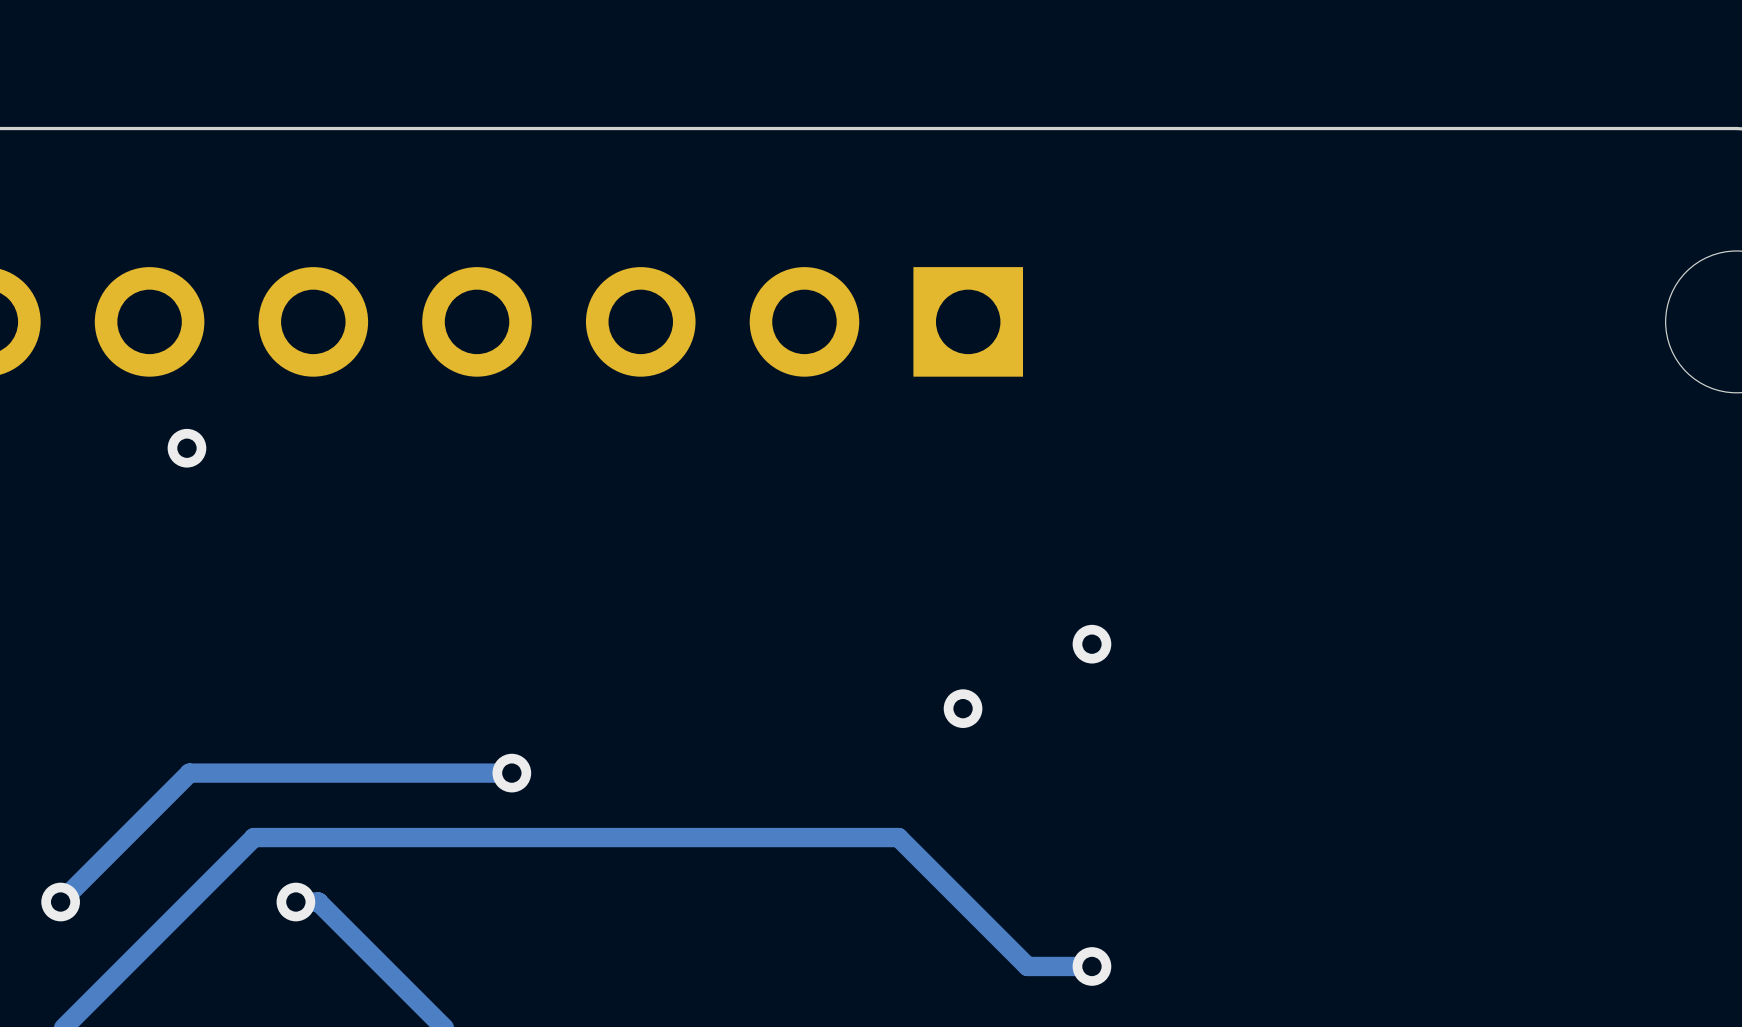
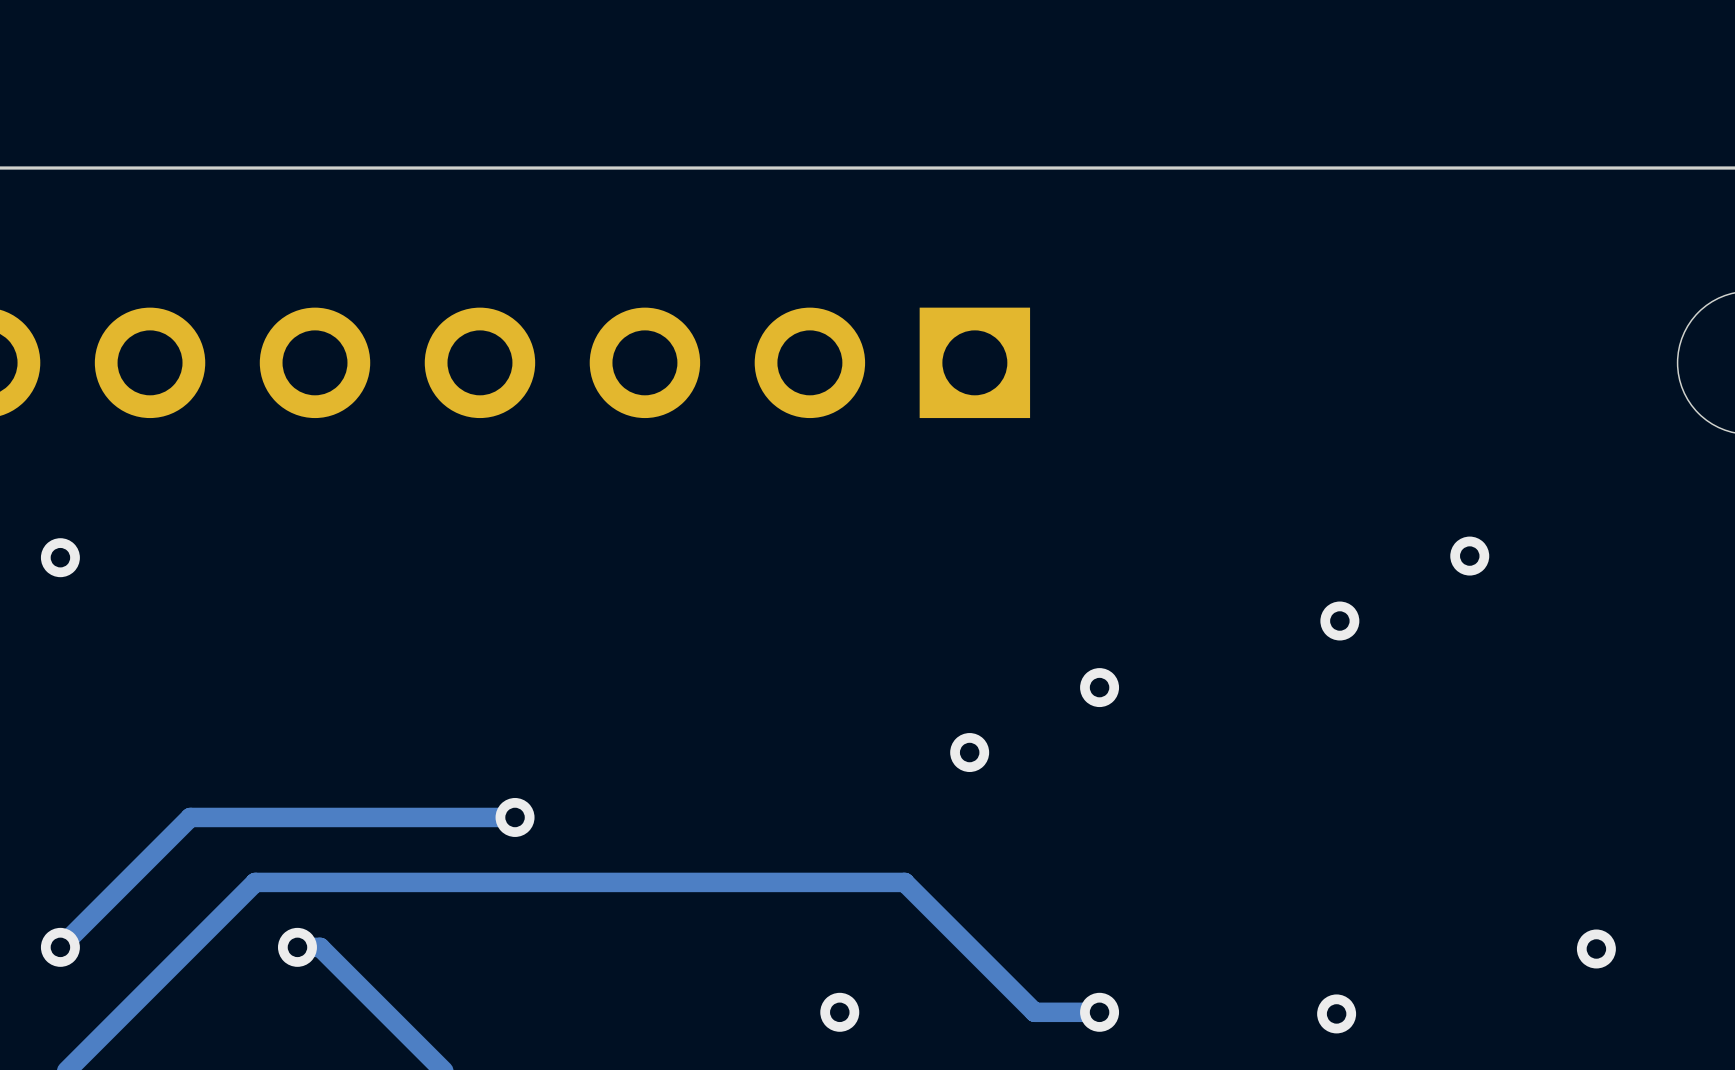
via position: (186, 448) -> (60, 557)
via: none -> (1469, 556)
via: none -> (1339, 621)
via: none -> (1596, 948)
via: none -> (839, 1012)
via: none -> (1336, 1013)

